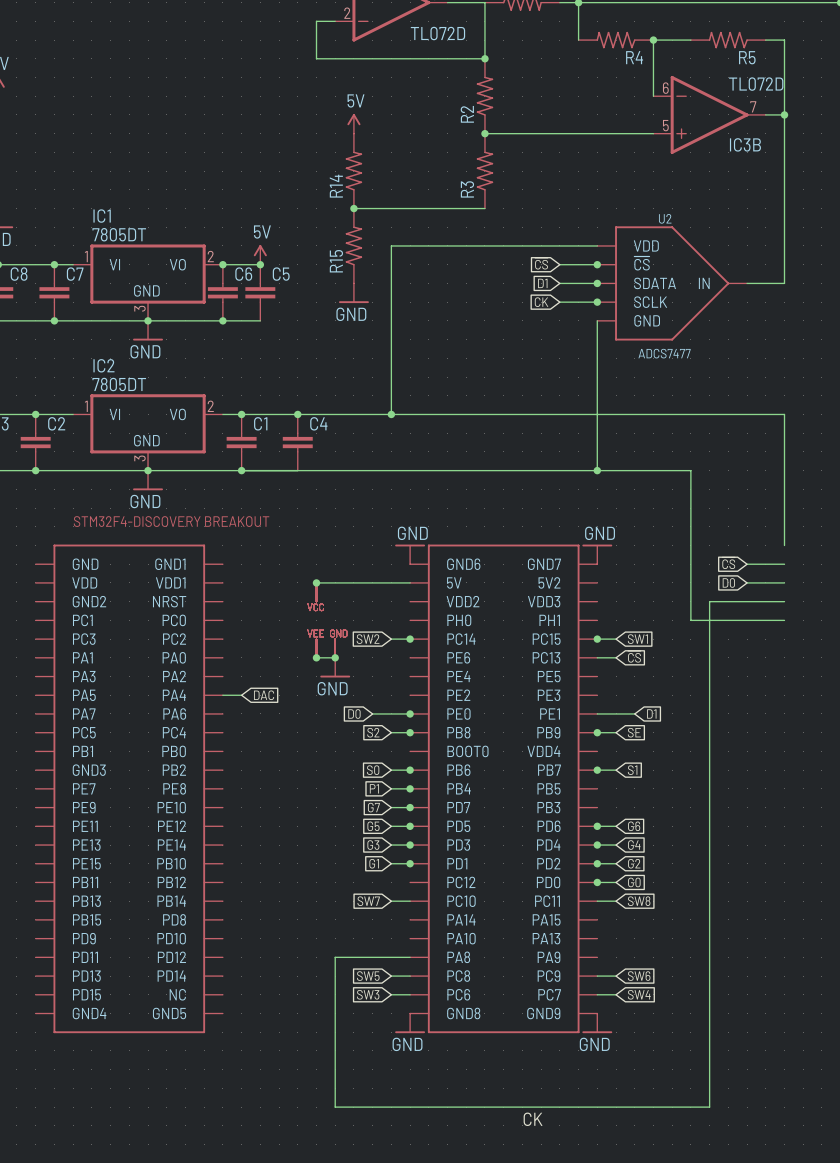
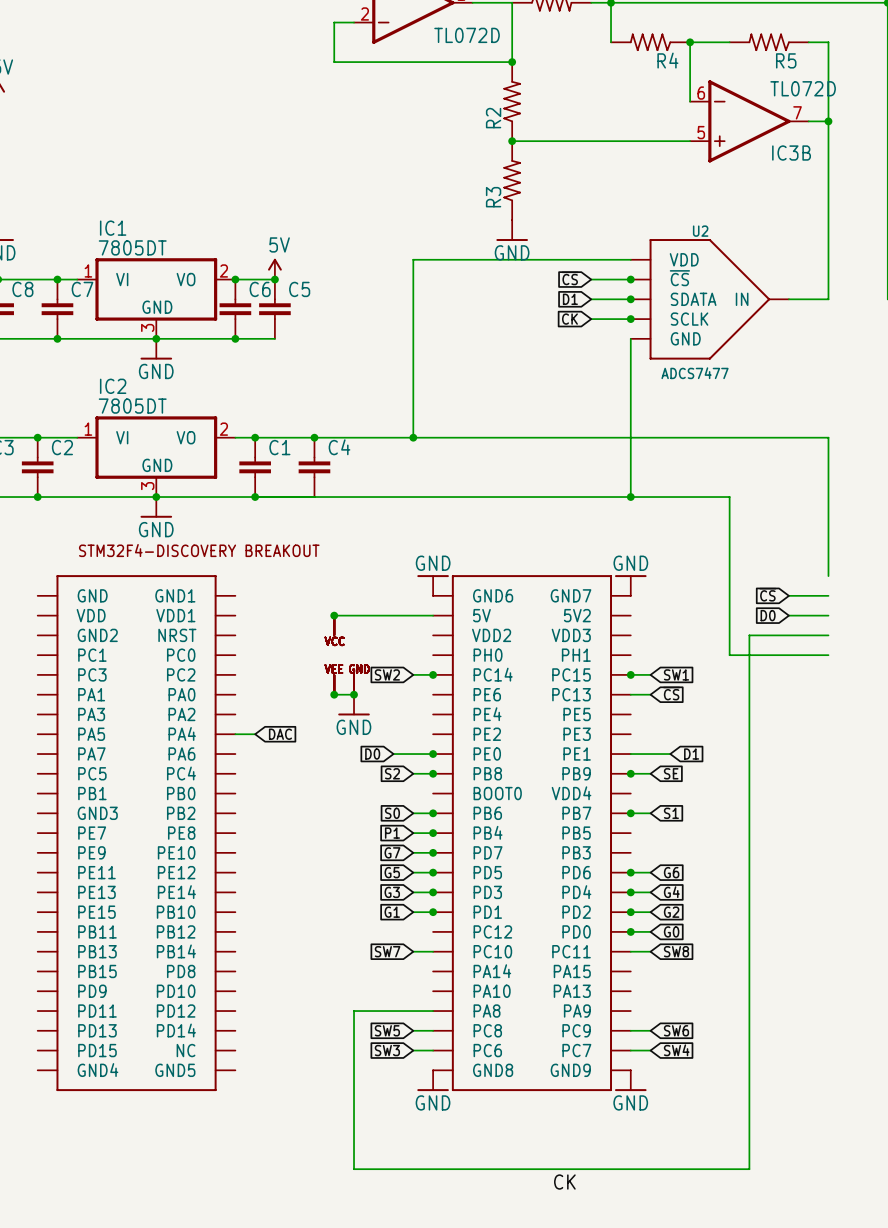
power symbol: 5V (353, 123) -> none
R14: (353, 171) -> none
wire: (353, 208) (484, 208) -> none
junction: (353, 208) -> none
R15: (353, 245) -> none
power symbol position: GND (353, 293) -> GND (512, 230)

